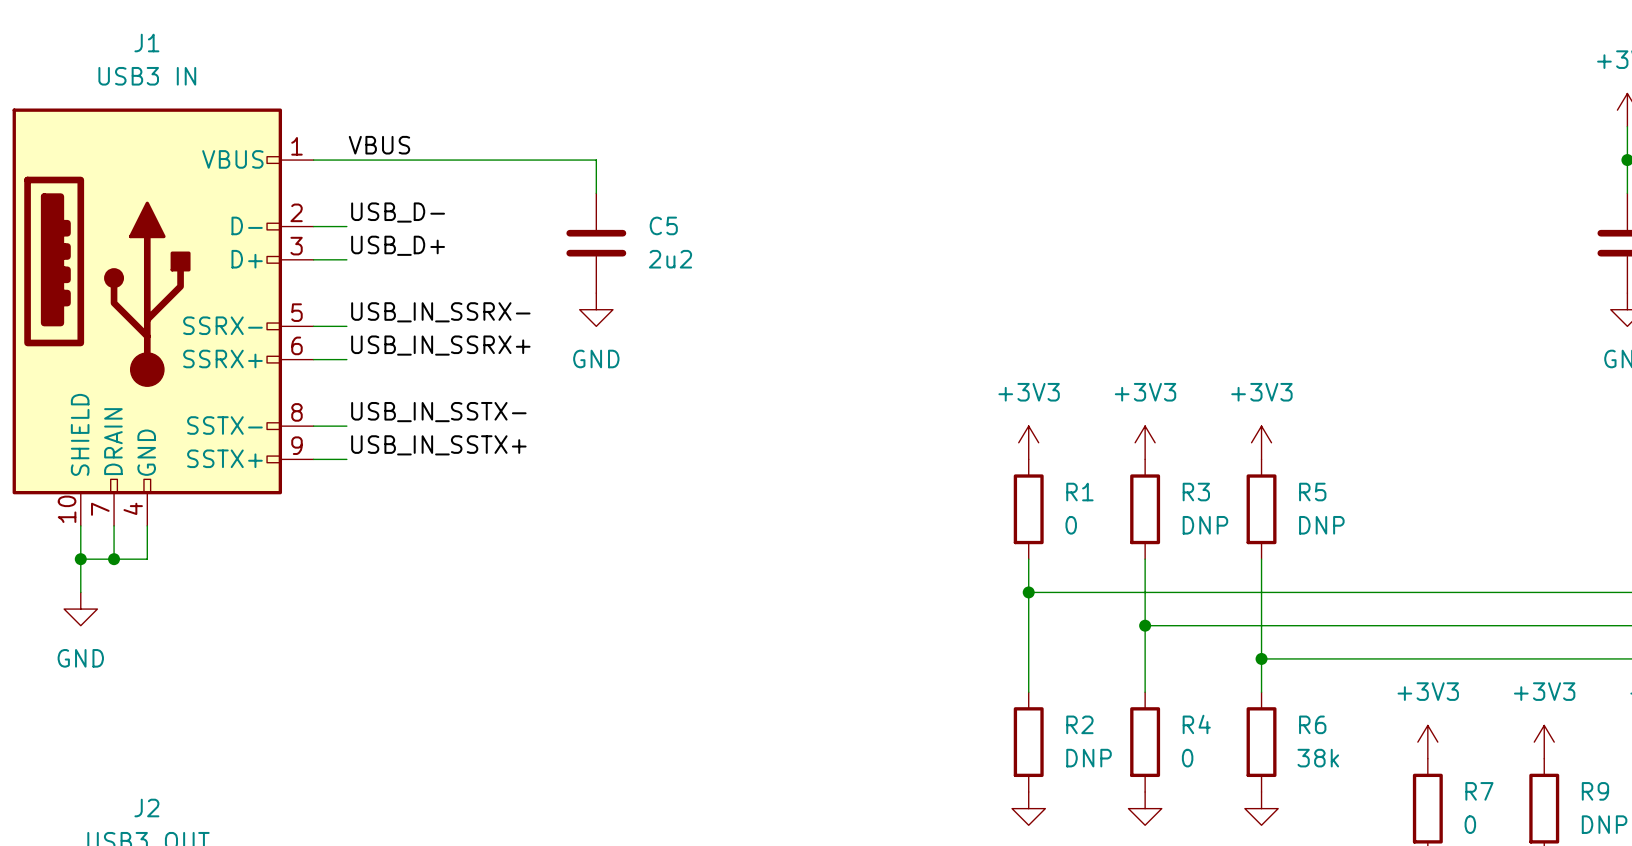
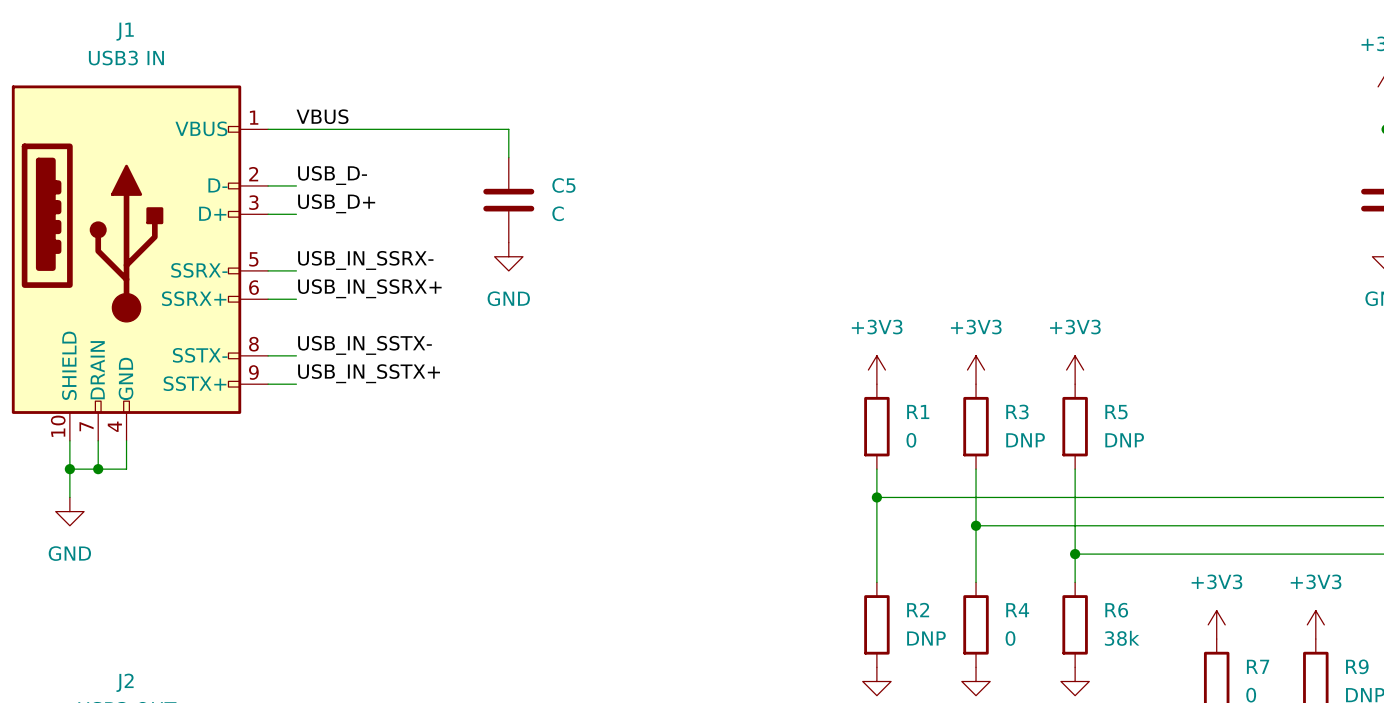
C5 value: 2u2 (670, 259) -> C (558, 213)

